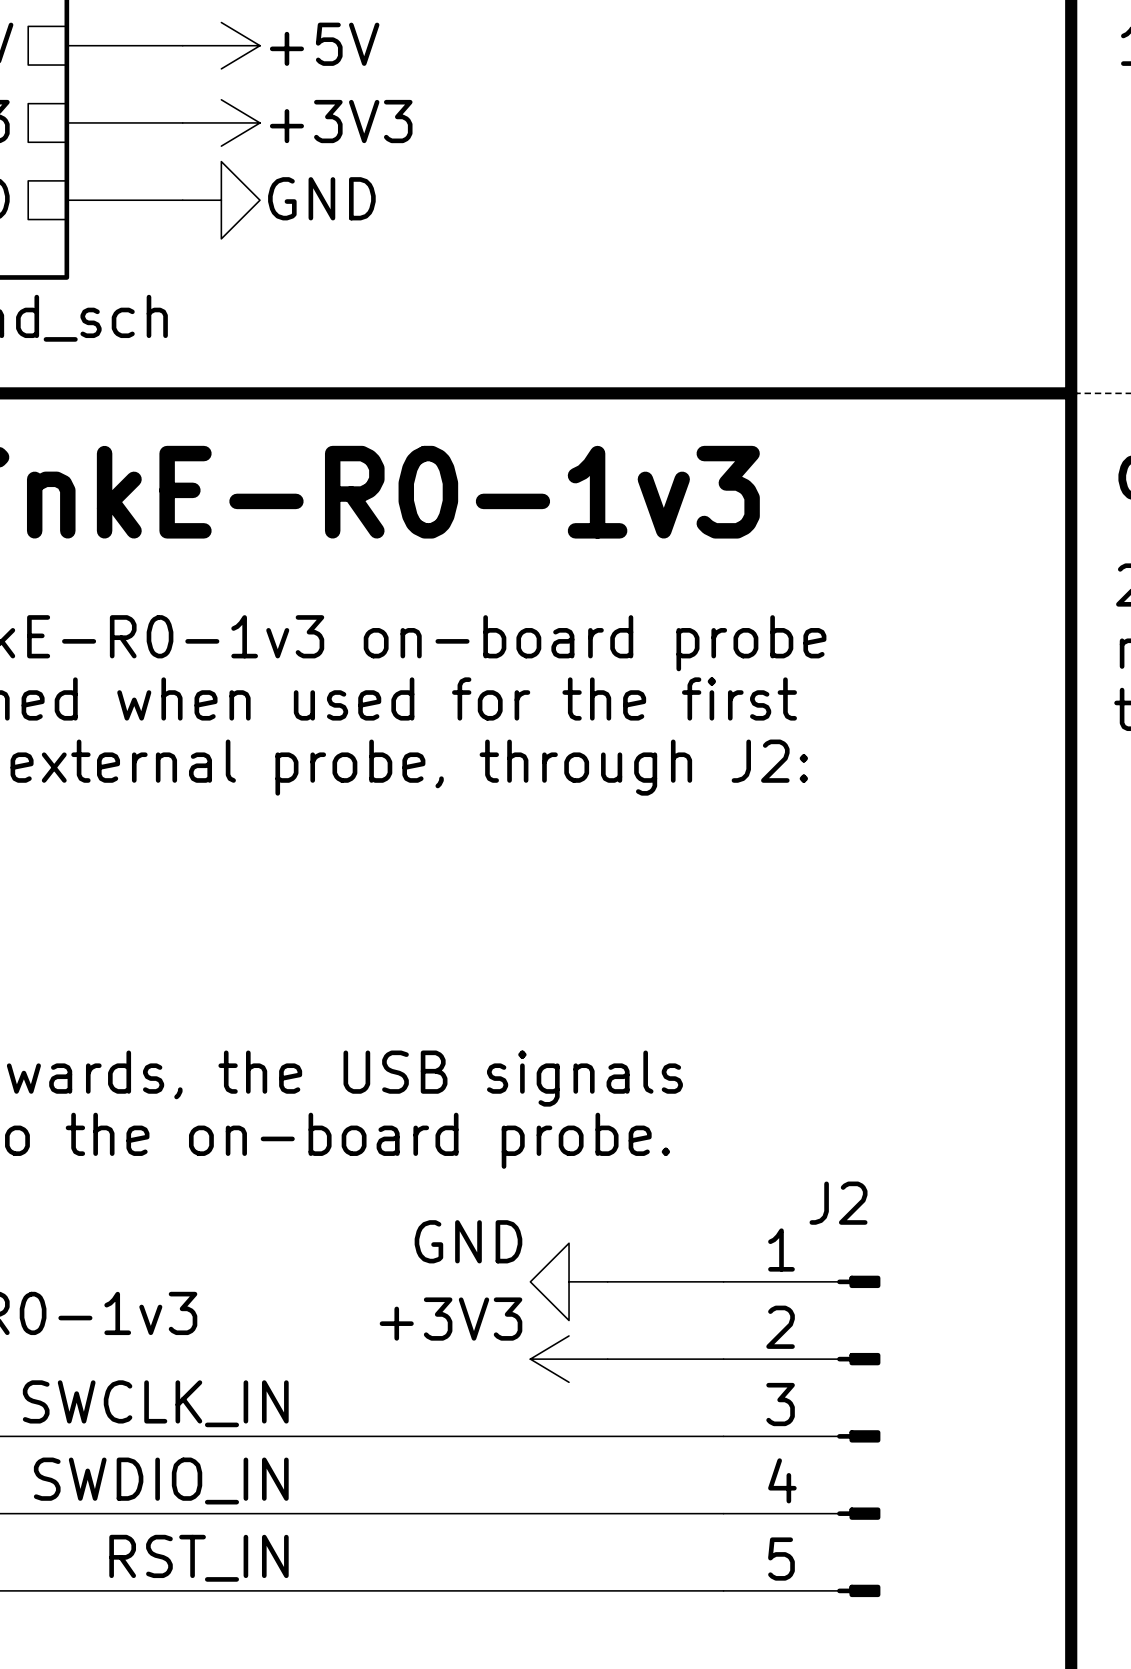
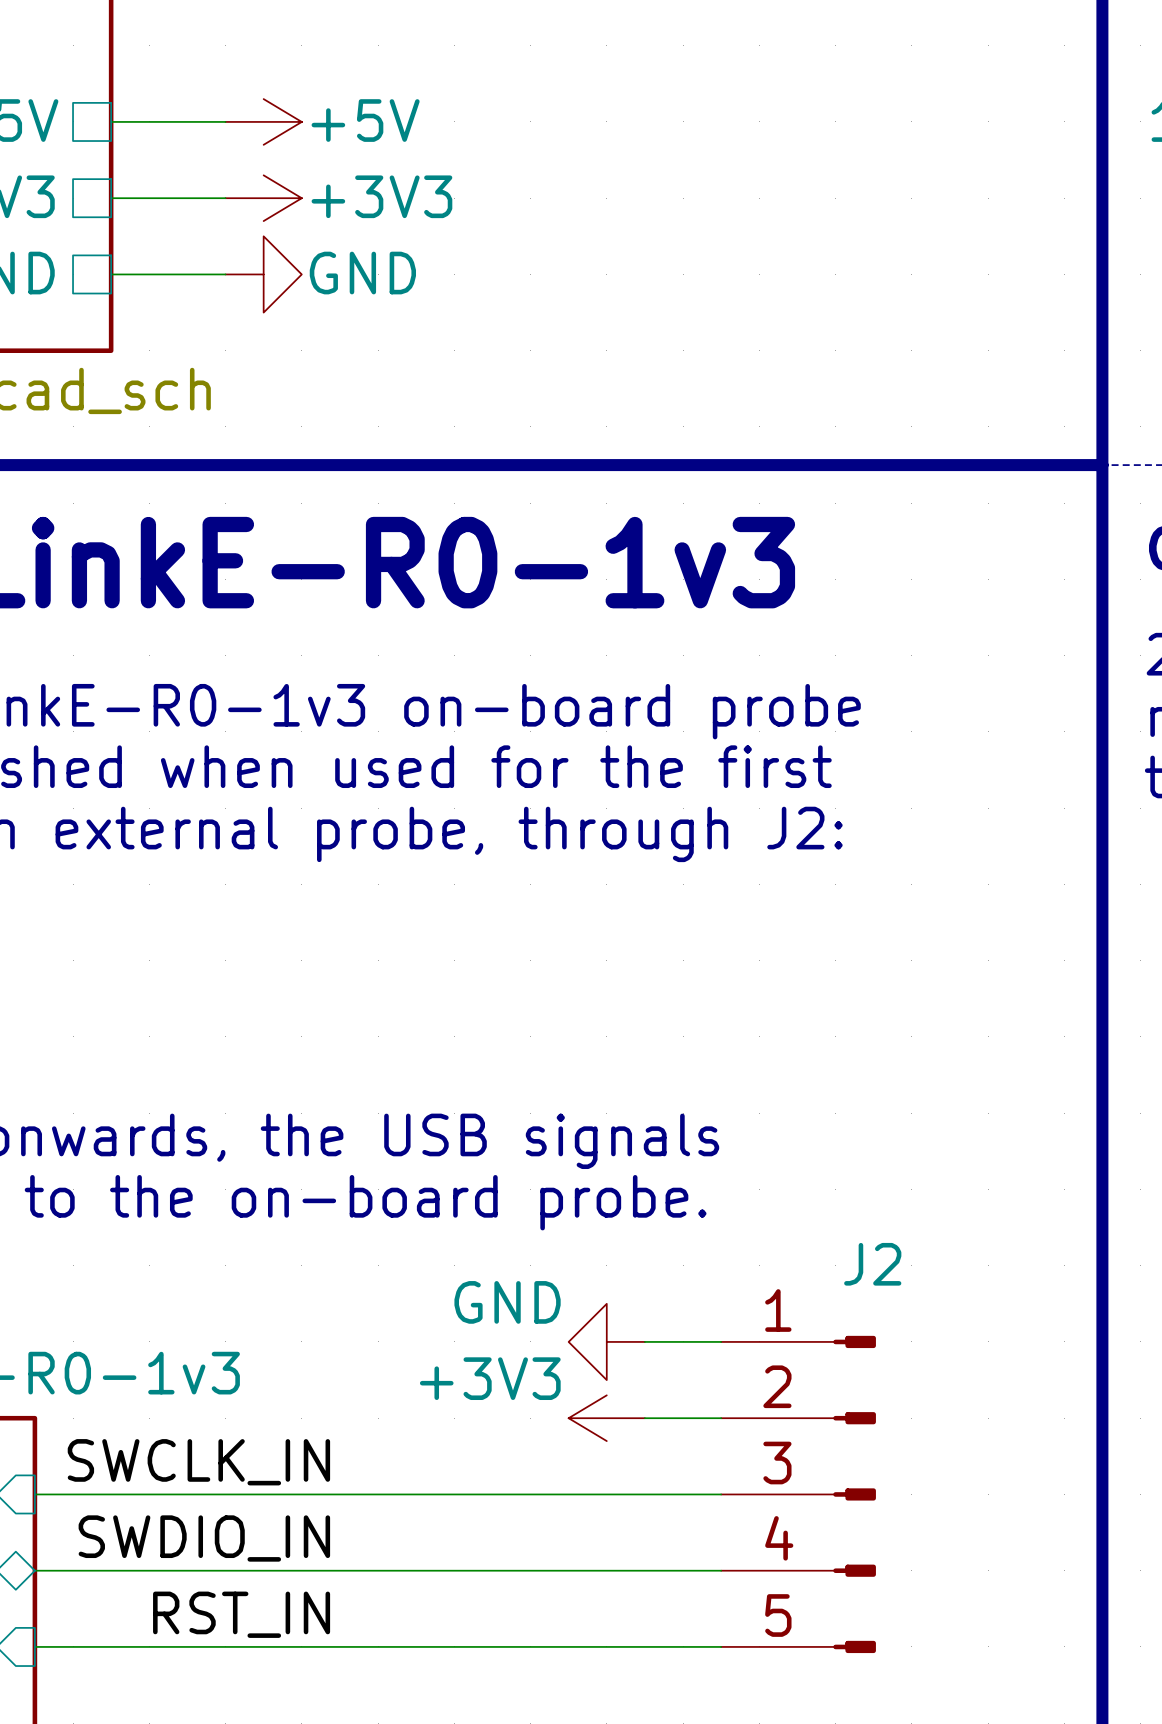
J2 position: (801, 1436) -> (798, 1494)

